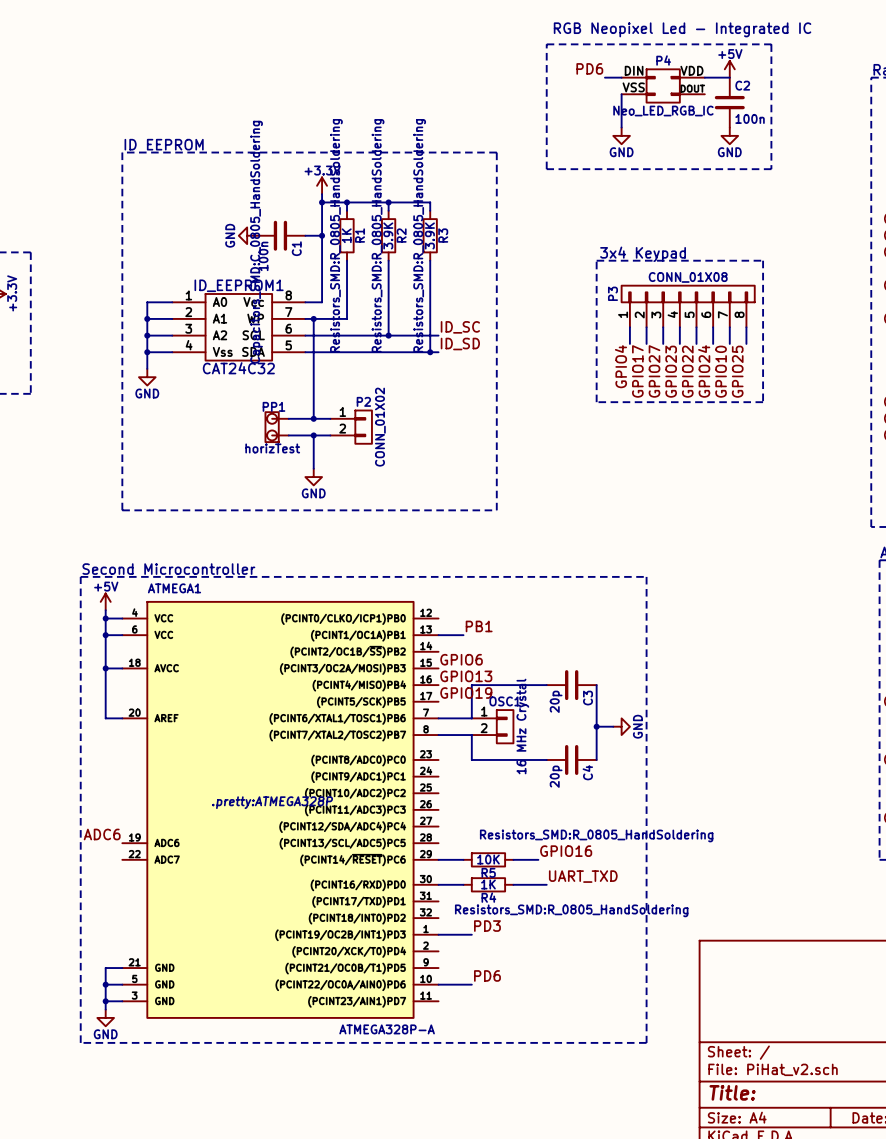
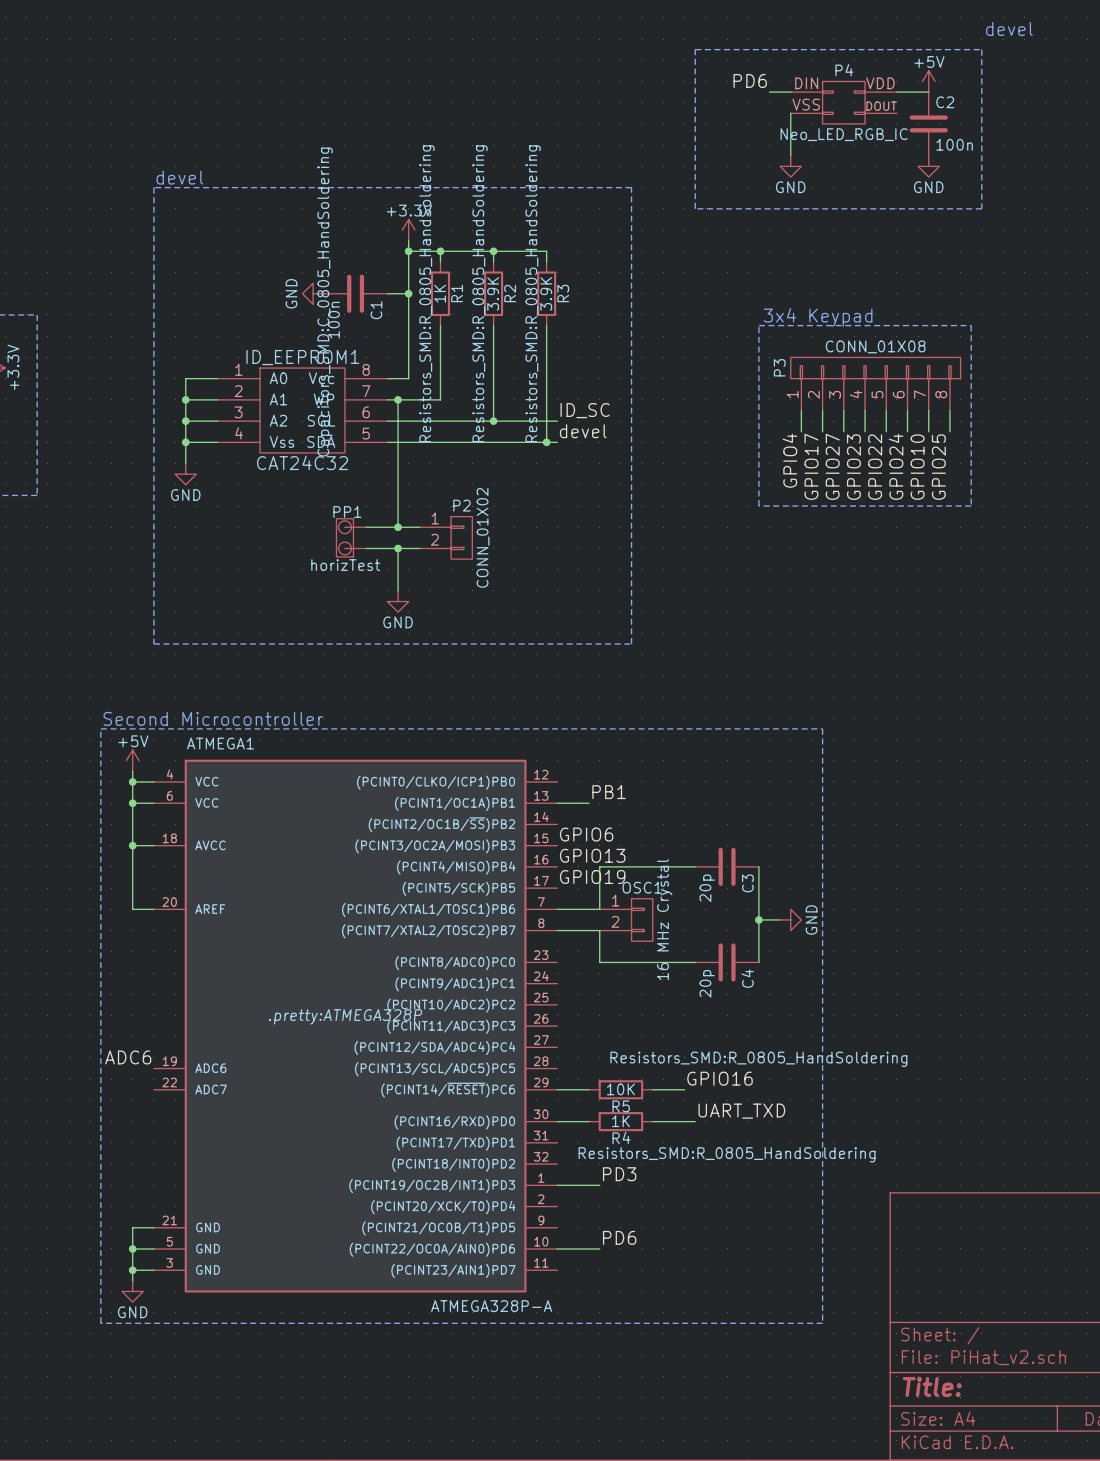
text: RGB Neopixel Led - Integrated IC (682, 29) -> devel (1009, 29)
text: ID EEPROM (164, 144) -> devel (179, 177)
label: ID_SD (460, 344) -> devel (583, 431)

